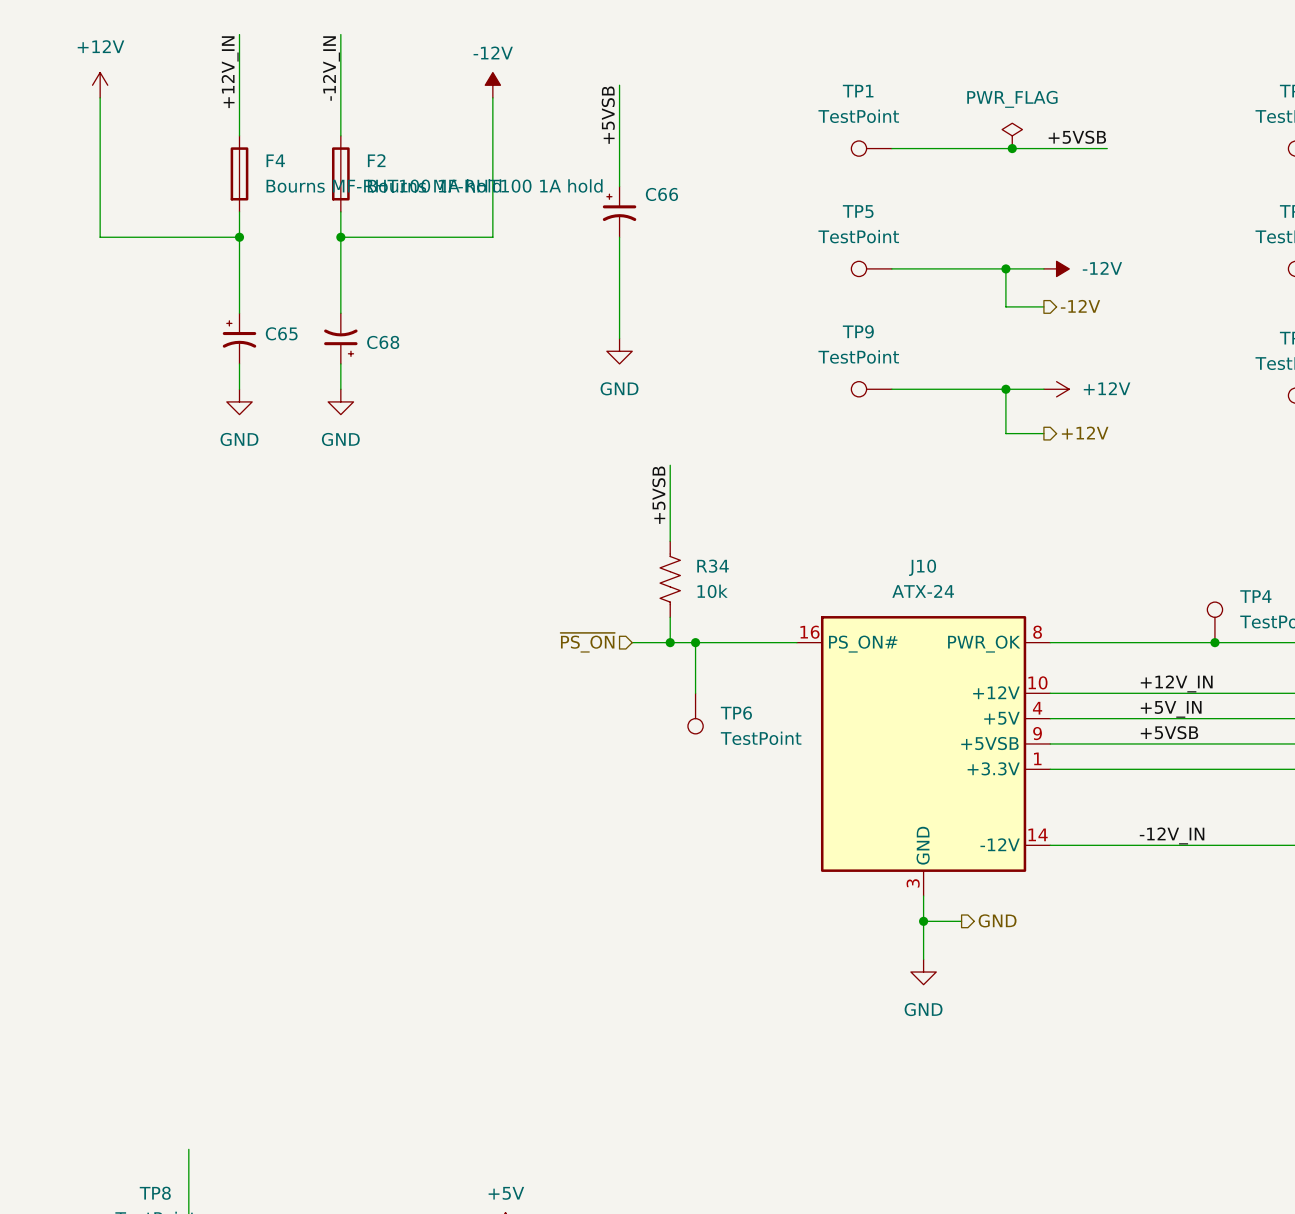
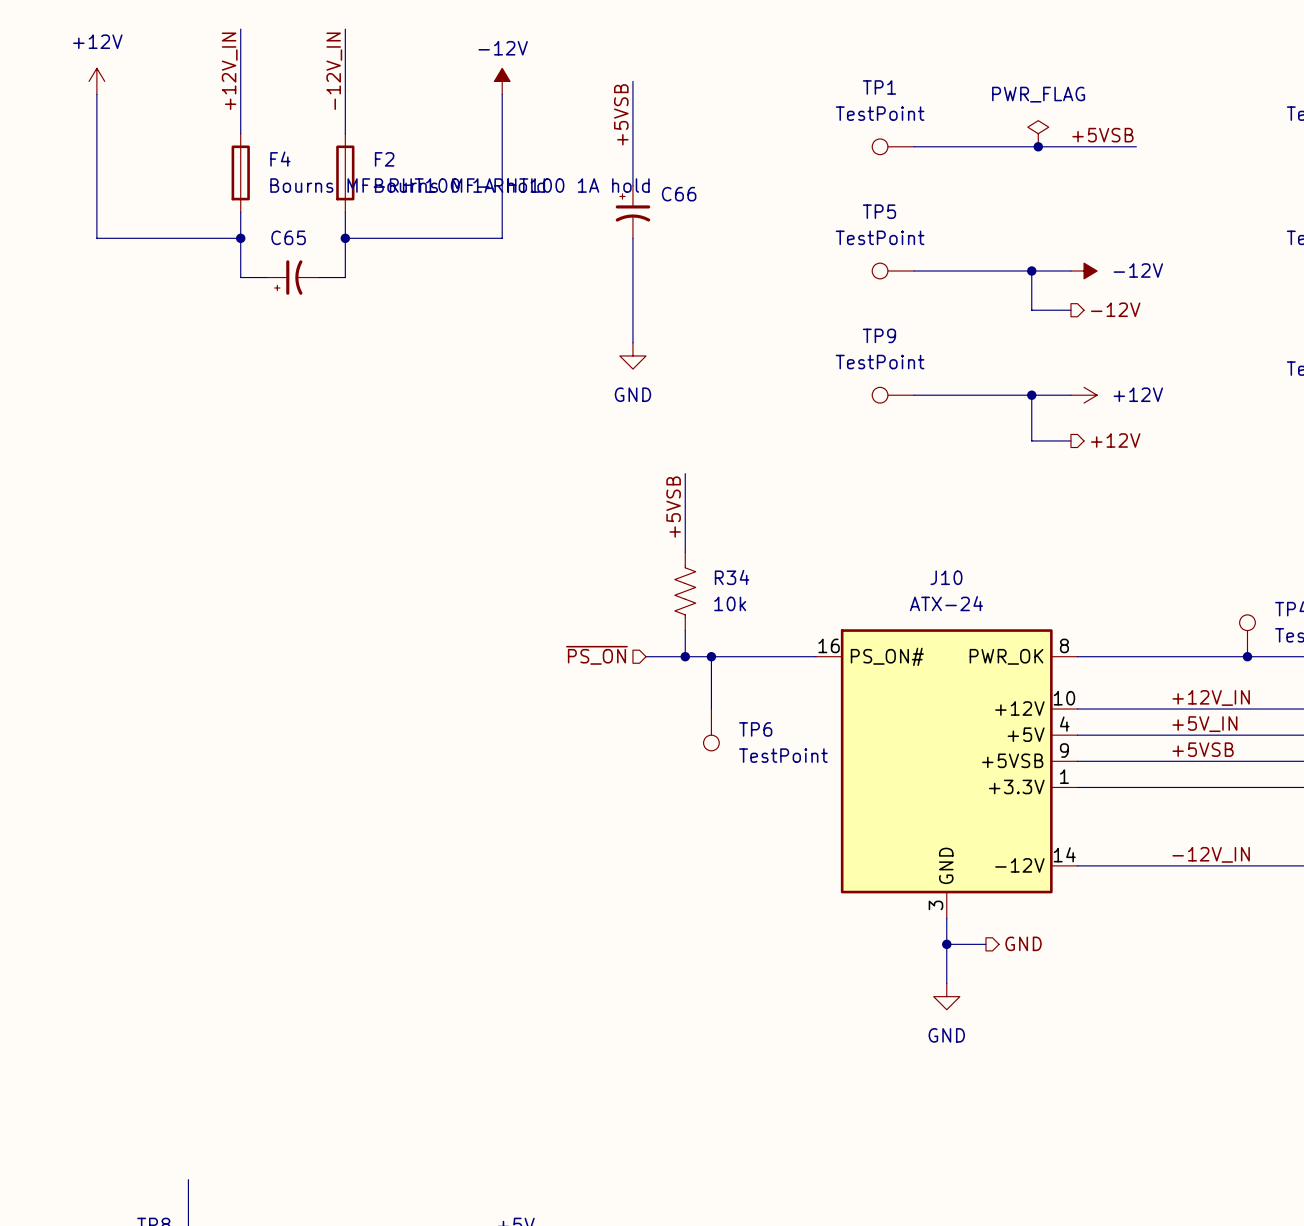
wire: (239, 275) (239, 313) -> (240, 277) (266, 277)
wire: (340, 275) (340, 313) -> (345, 277) (319, 277)
C65 rotation: 0° (239, 334) -> 90° counterclockwise (288, 277)
C65 position: (239, 338) -> (293, 277)
C68: (340, 338) -> none
wire: (239, 363) (239, 389) -> none
wire: (340, 363) (340, 389) -> none
power symbol: GND (239, 401) -> none
power symbol: GND (340, 401) -> none

